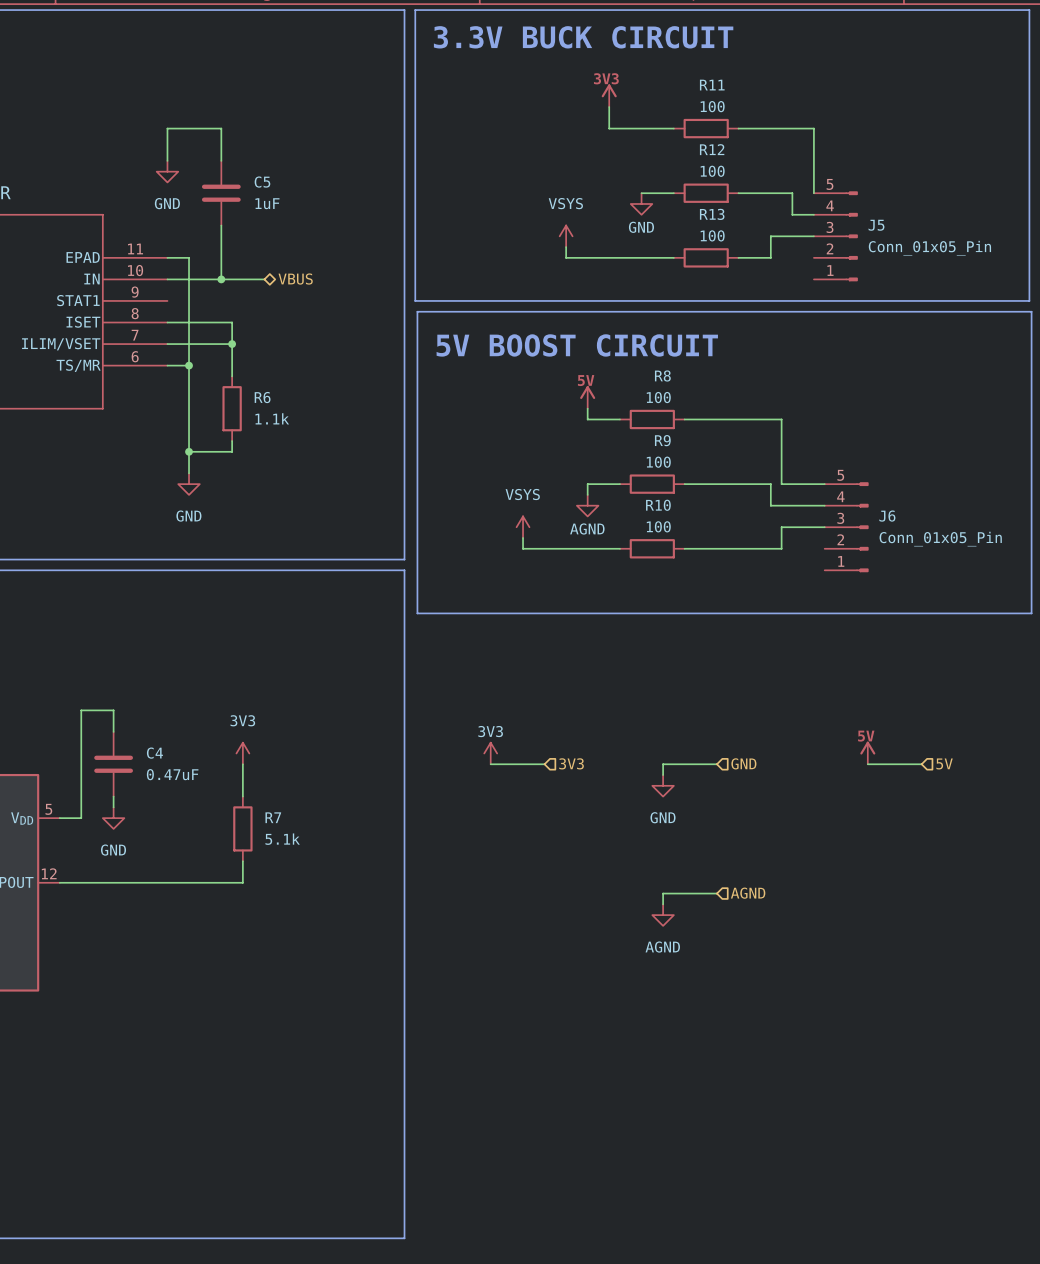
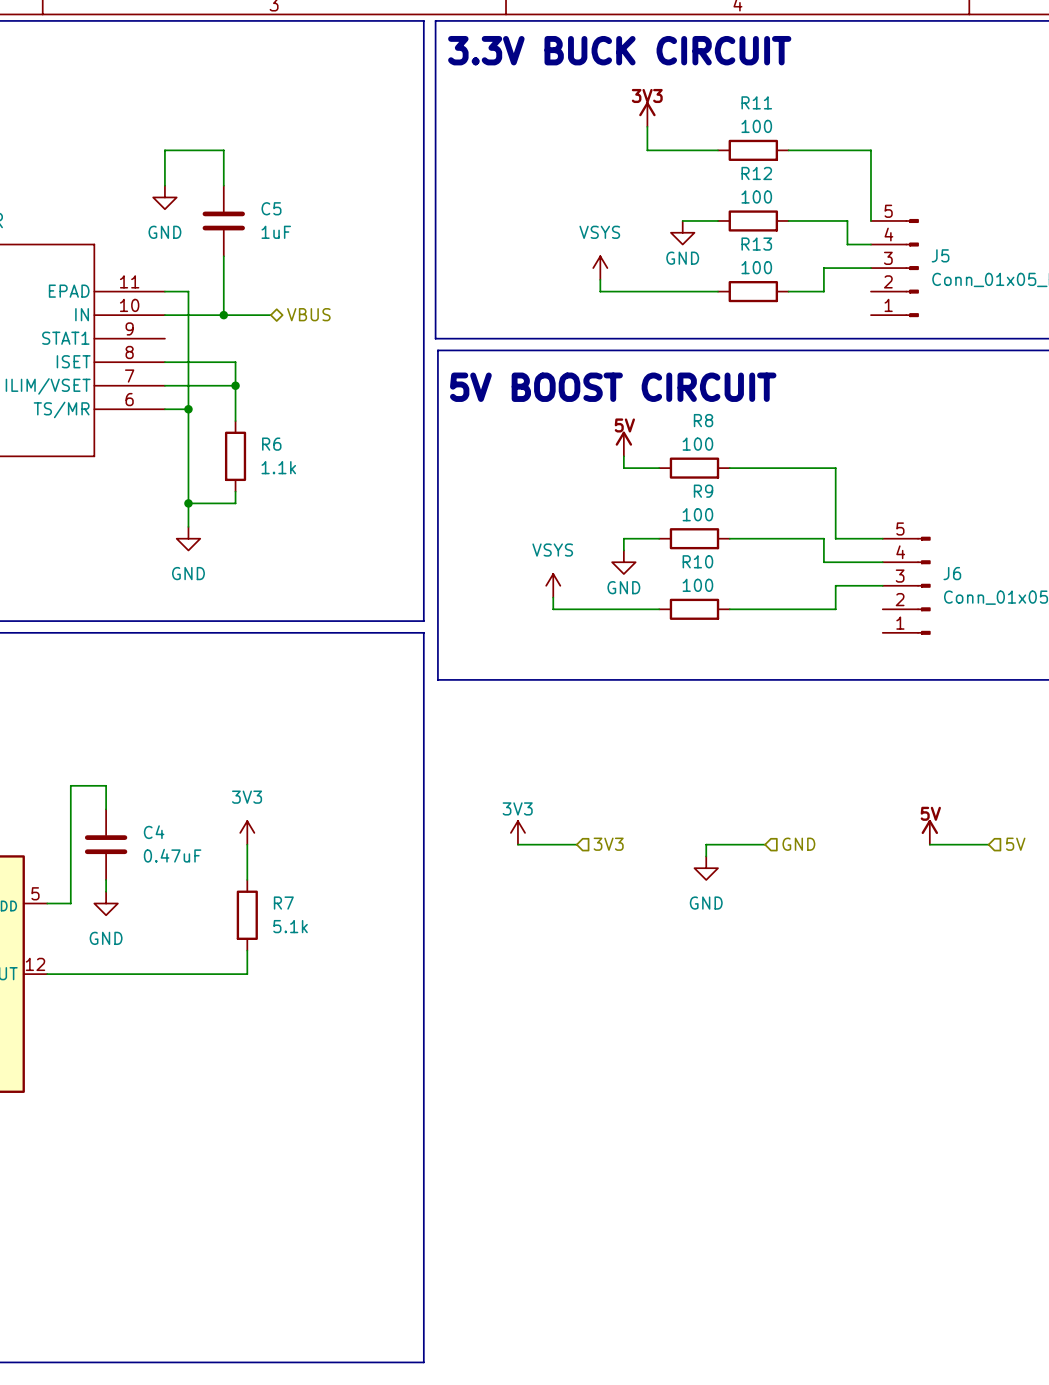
power symbol: AGND (587, 505) -> GND (623, 562)
wire: (716, 893) (663, 893) (663, 904) -> none
hierarchical label: AGND (748, 893) -> none
power symbol: AGND (663, 915) -> none

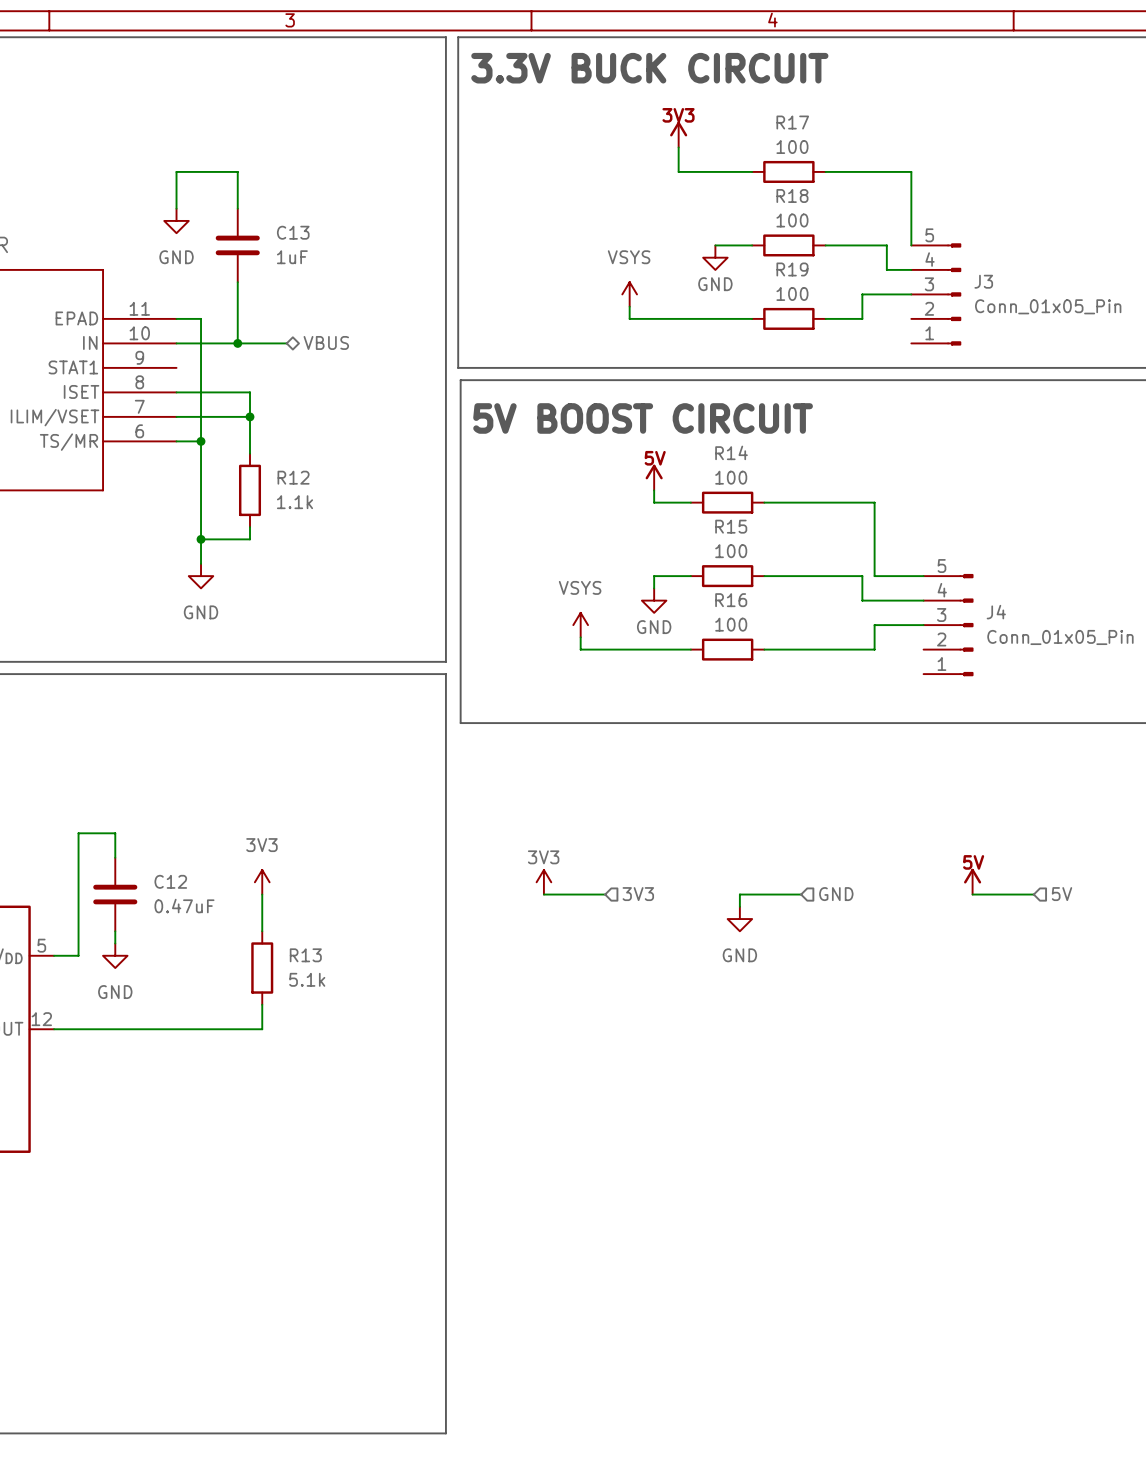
R11 name: R11 (756, 102) -> R17 (792, 122)
R12 name: R12 (756, 173) -> R18 (792, 195)
C5 name: C5 (271, 208) -> C13 (293, 232)
R13 name: R13 (756, 244) -> R19 (792, 269)
J5 name: J5 (940, 255) -> J3 (983, 281)
R8 name: R8 (703, 420) -> R14 (731, 452)
R6 name: R6 (271, 444) -> R12 (293, 477)
R9 name: R9 (703, 491) -> R15 (731, 526)
R10 name: R10 (697, 561) -> R16 (731, 600)
J6 name: J6 (952, 573) -> J4 (996, 612)
C4 name: C4 (154, 832) -> C12 (170, 881)
R7 name: R7 (283, 903) -> R13 (305, 955)

